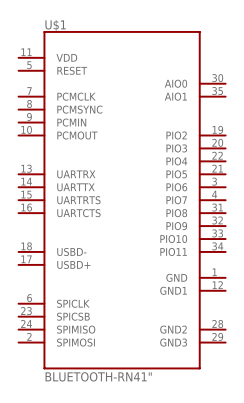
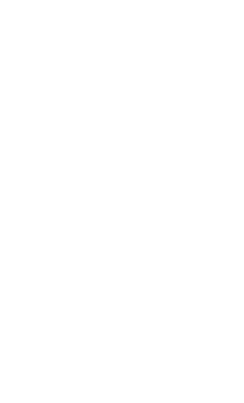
U$1: BLUETOOTH-RN41" (122, 200) -> none

